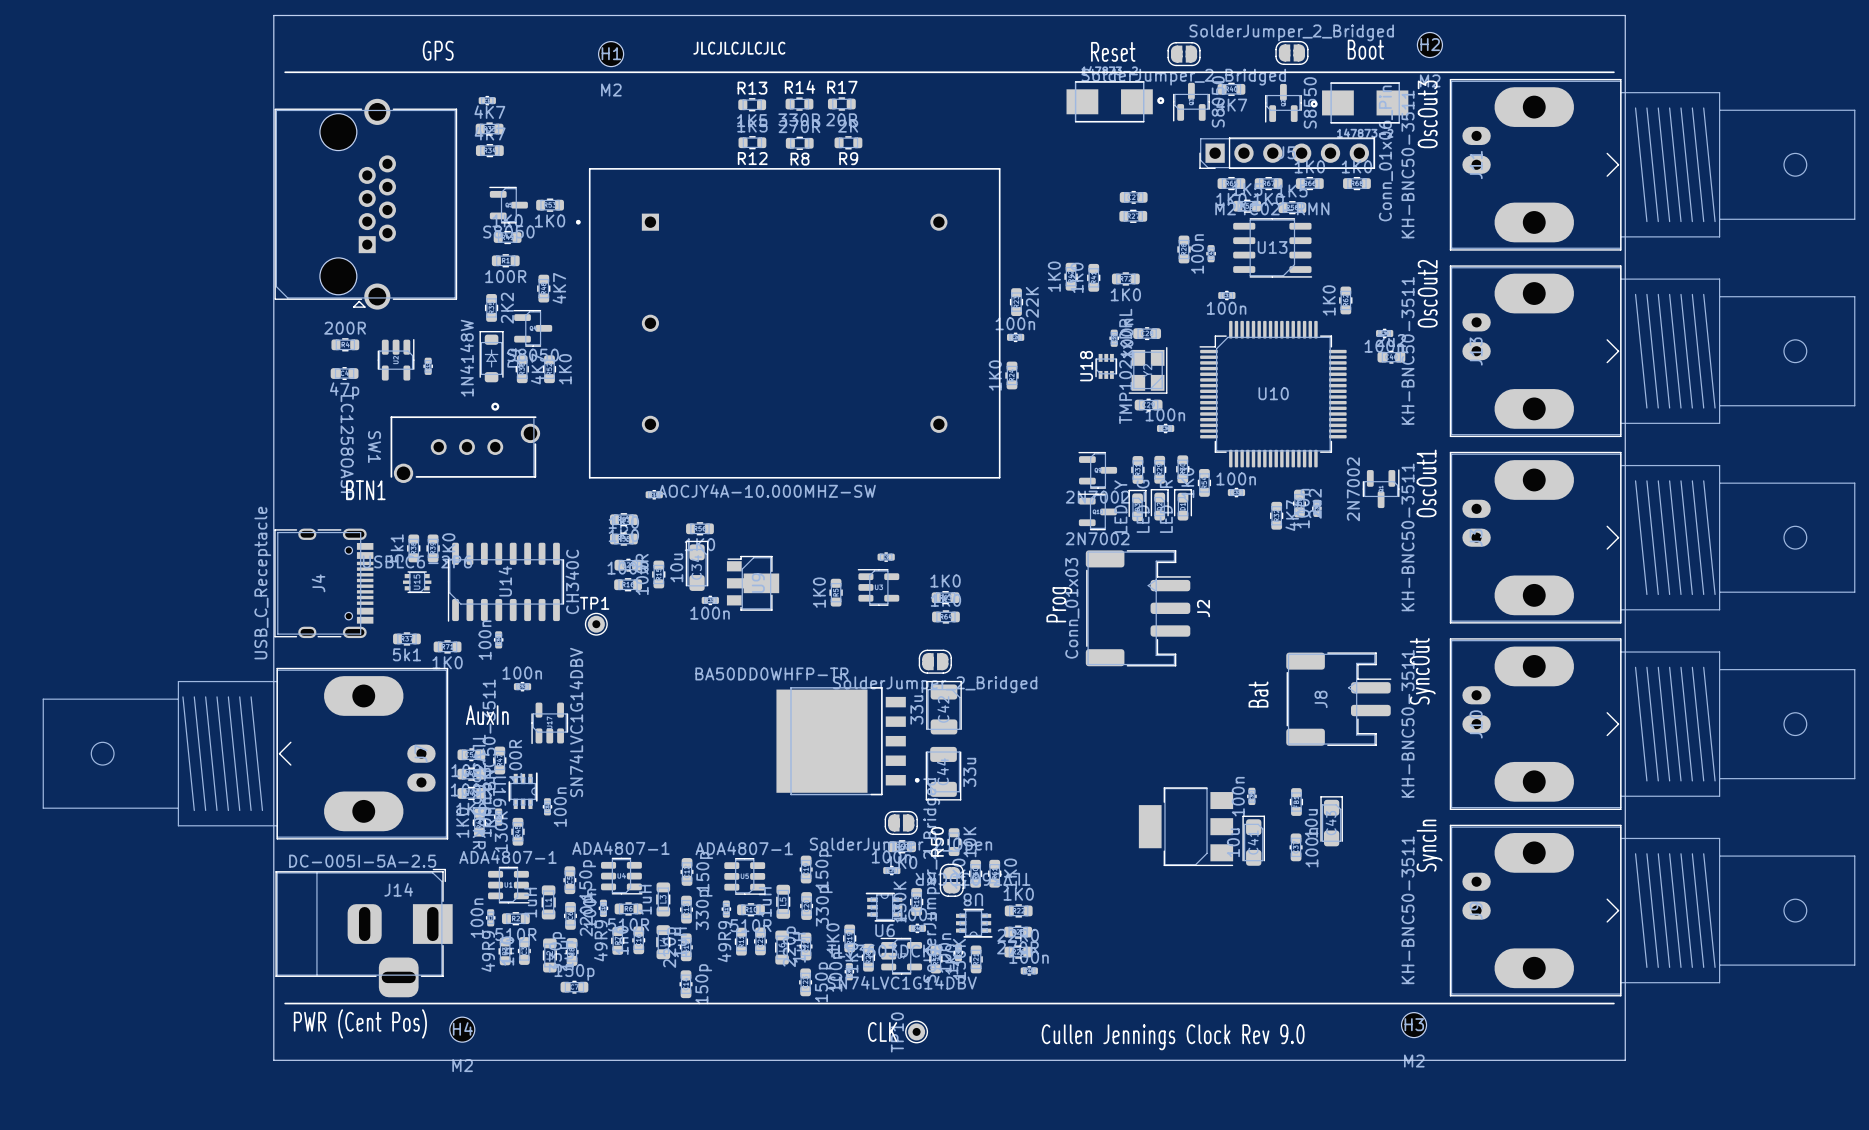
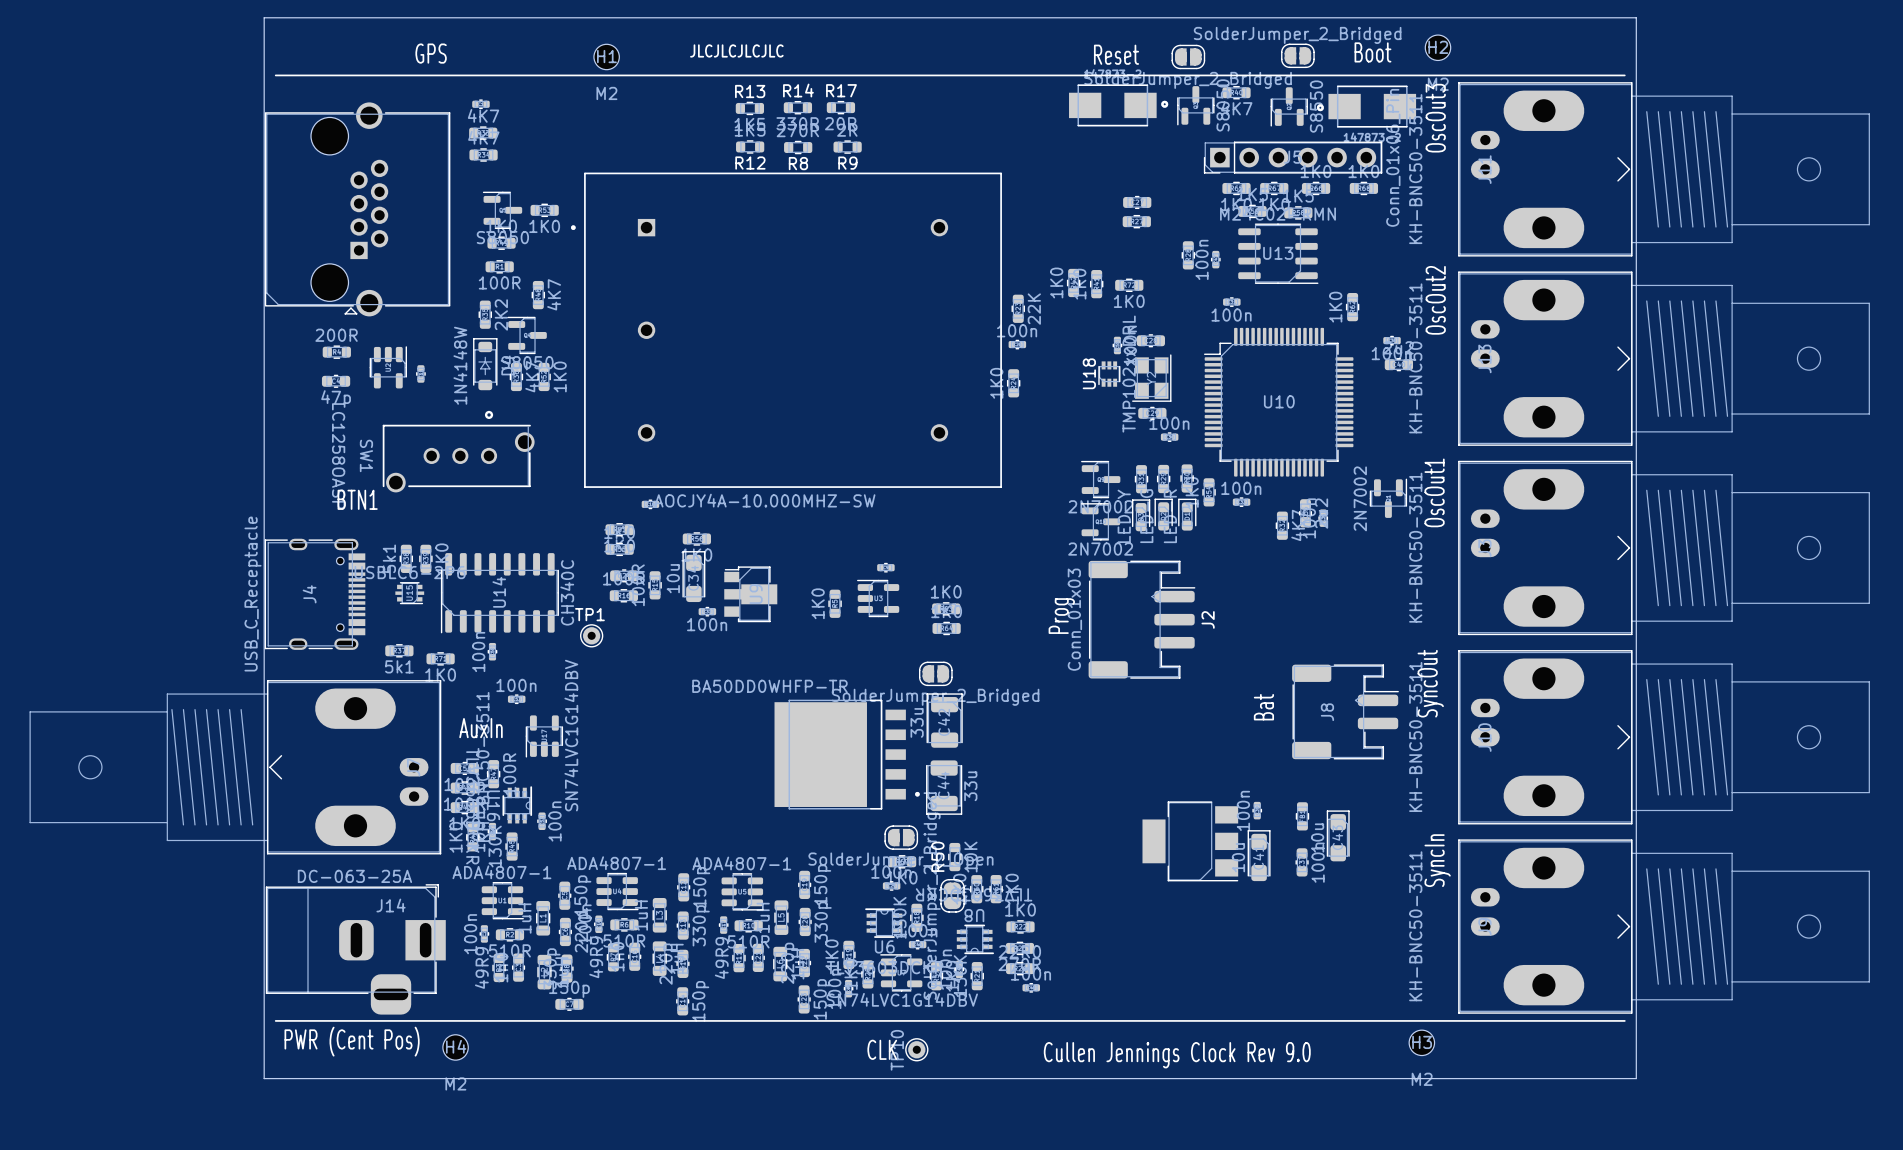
J14 value: DC-005I-5A-2.5 (362, 861) -> DC-063-25A (354, 876)

